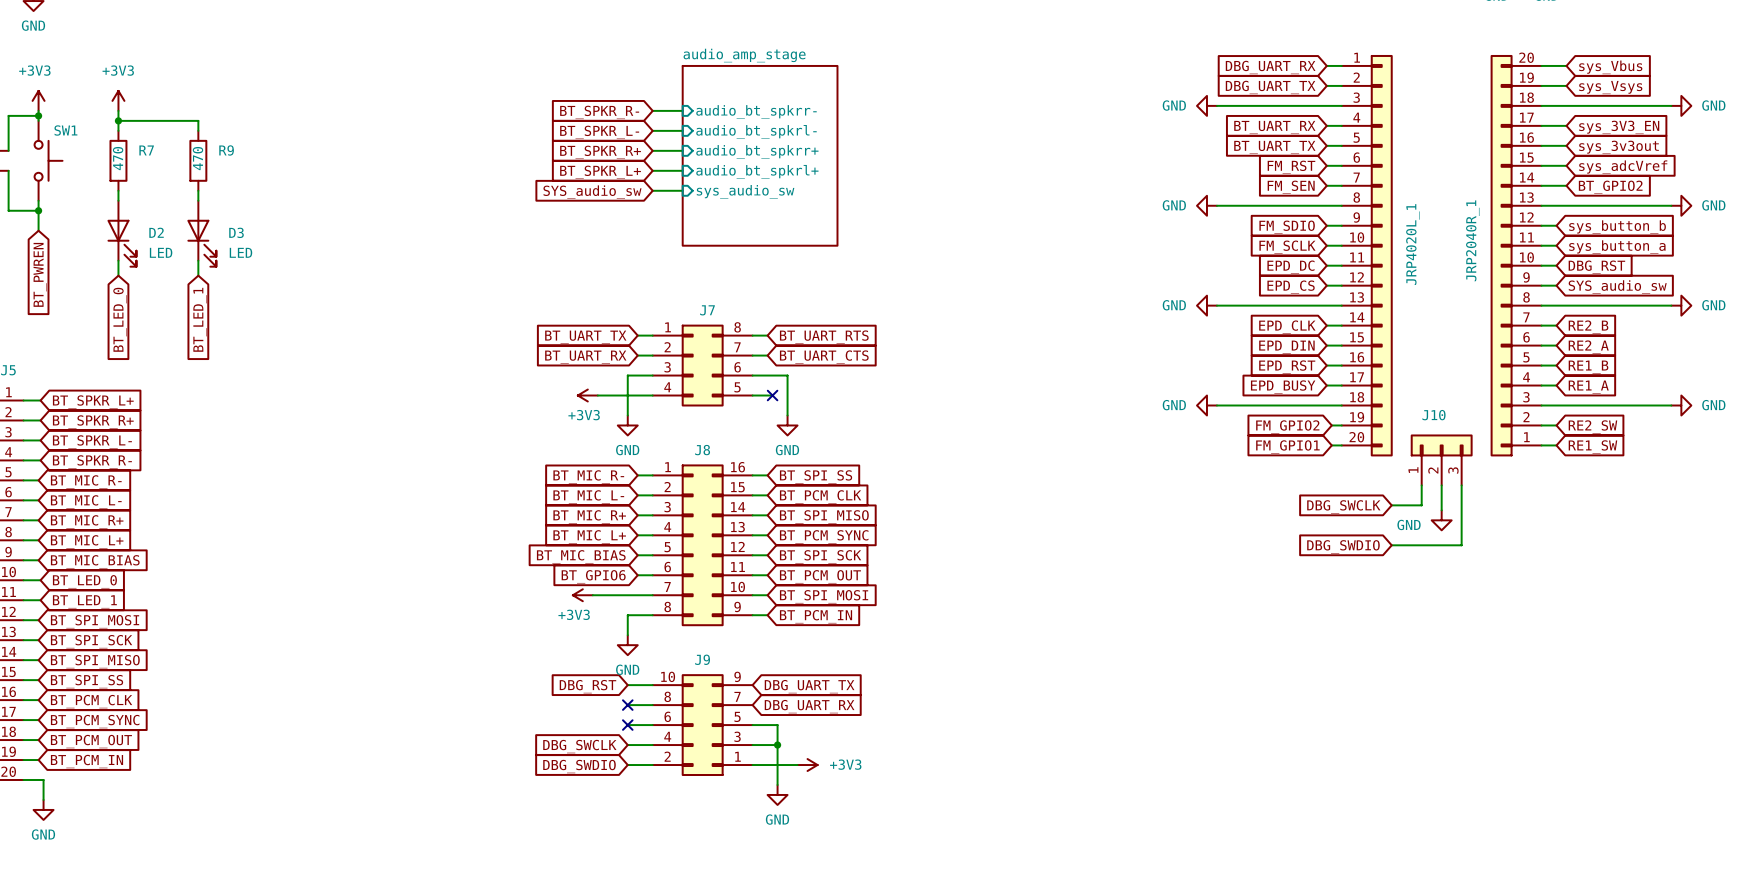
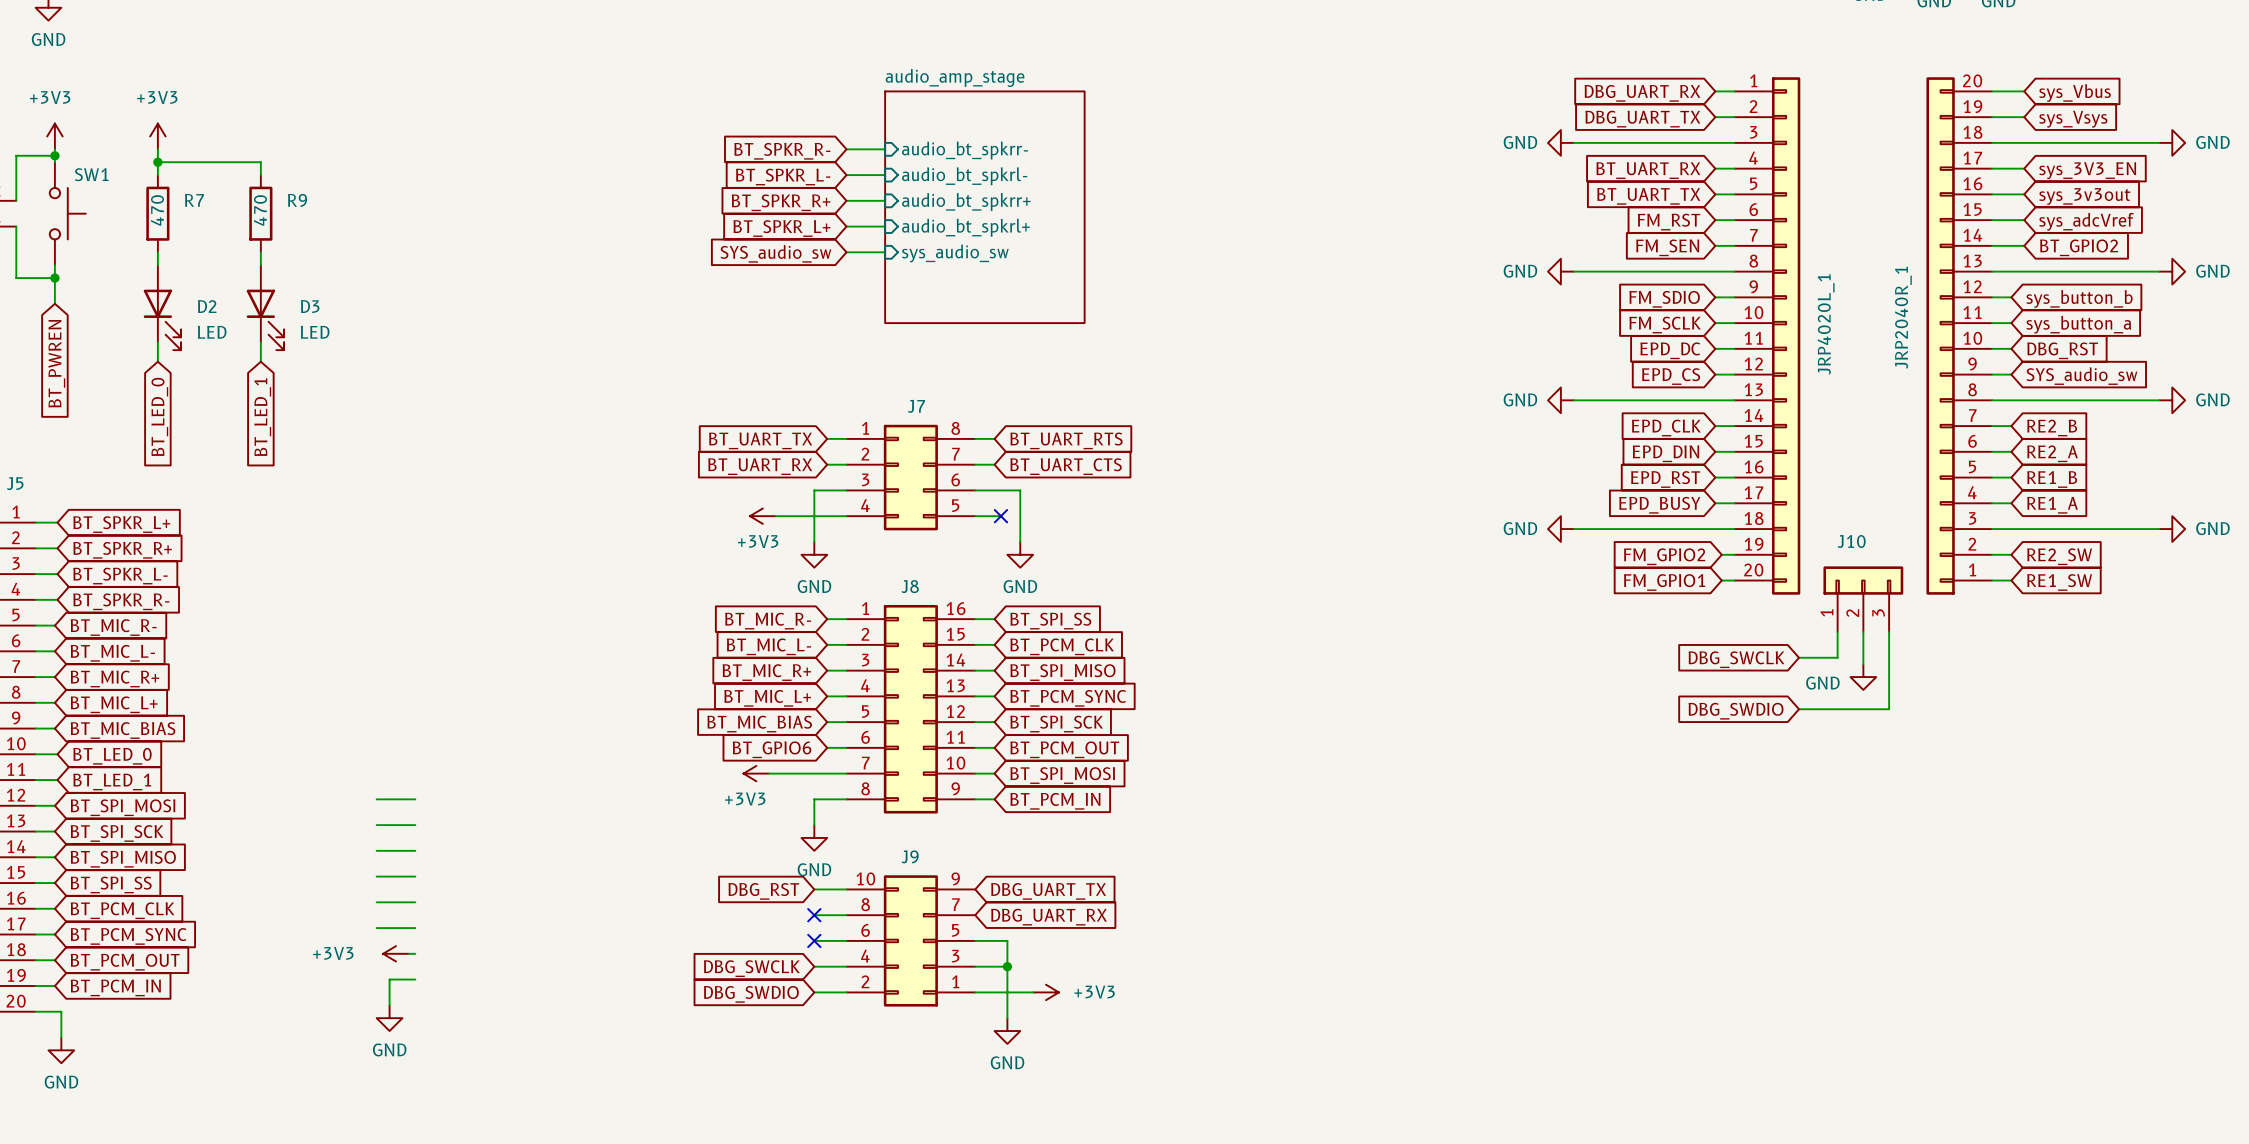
wire: none -> (376, 799) (415, 799)
wire: none -> (376, 825) (415, 825)
wire: none -> (376, 850) (415, 850)
wire: none -> (376, 876) (415, 876)
wire: none -> (376, 902) (415, 902)
wire: none -> (376, 928) (415, 928)
power symbol: none -> +3V3 (396, 953)
wire: none -> (408, 953) (415, 953)
wire: none -> (415, 979) (389, 979) (389, 1005)
power symbol: none -> GND (389, 1018)

